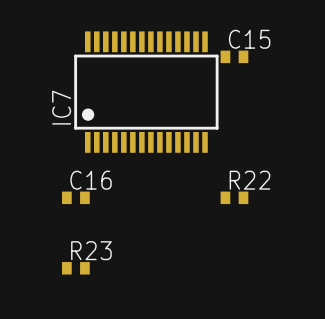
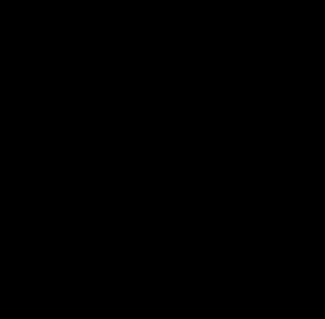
C15: (234, 56) -> none
IC7: (146, 92) -> none
C16: (75, 197) -> none
R22: (234, 197) -> none
R23: (75, 268) -> none

